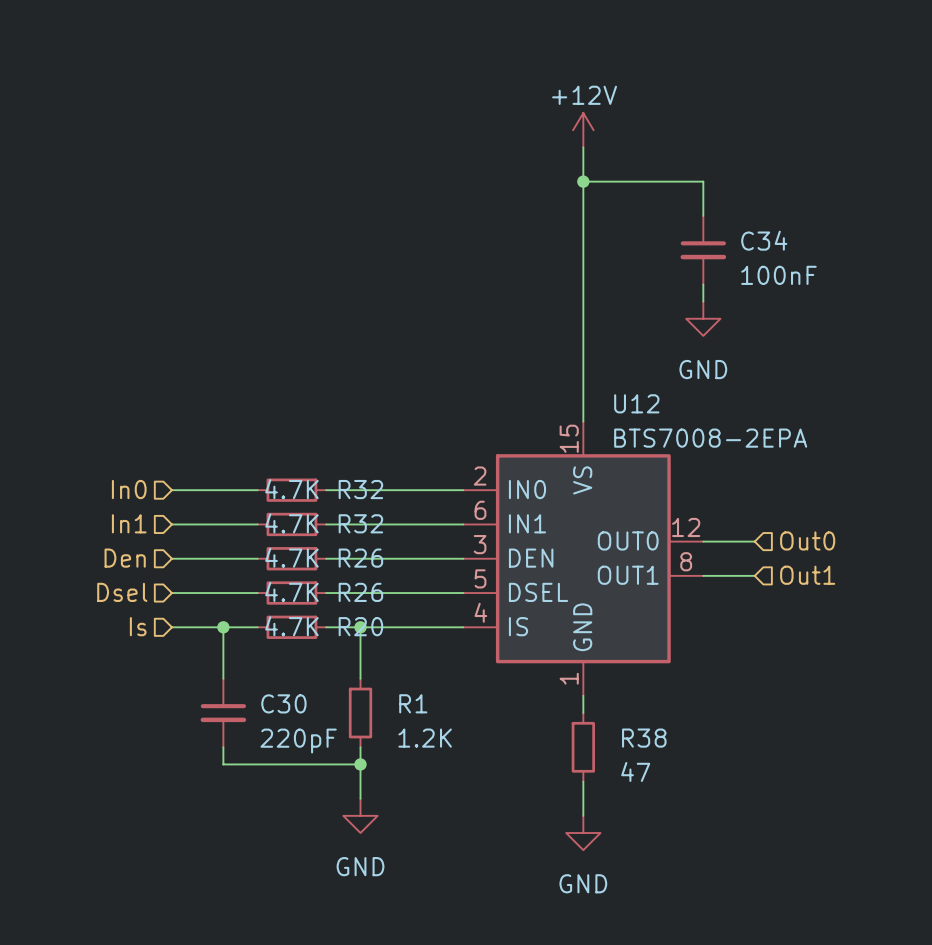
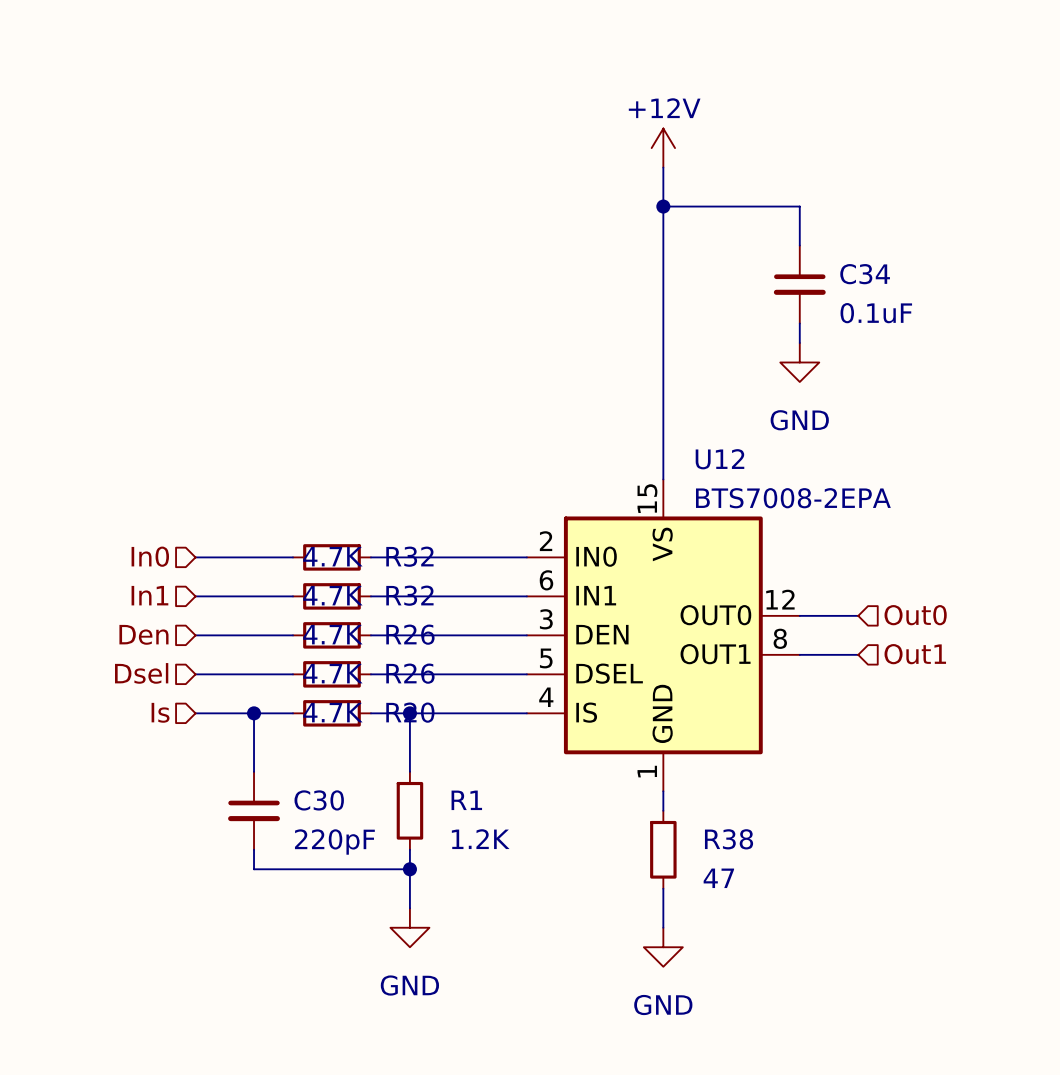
C34 value: 100nF (778, 275) -> 0.1uF (876, 313)

